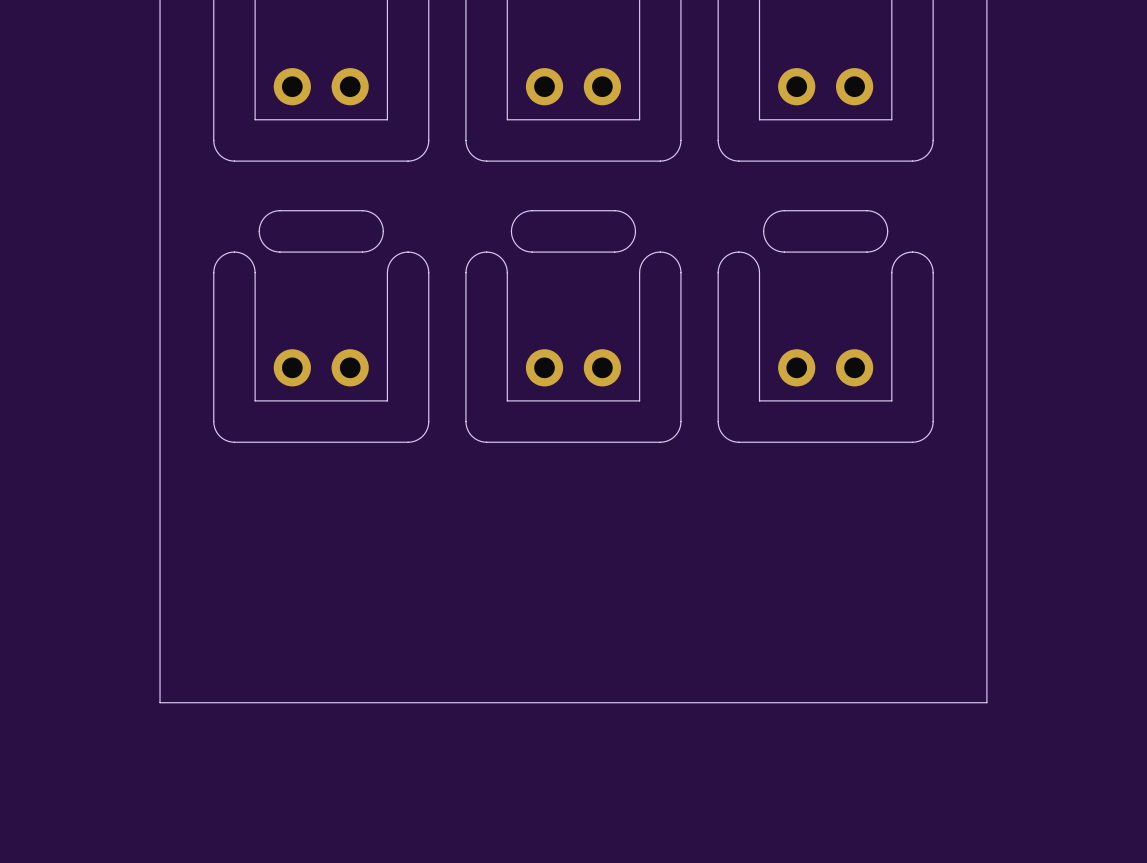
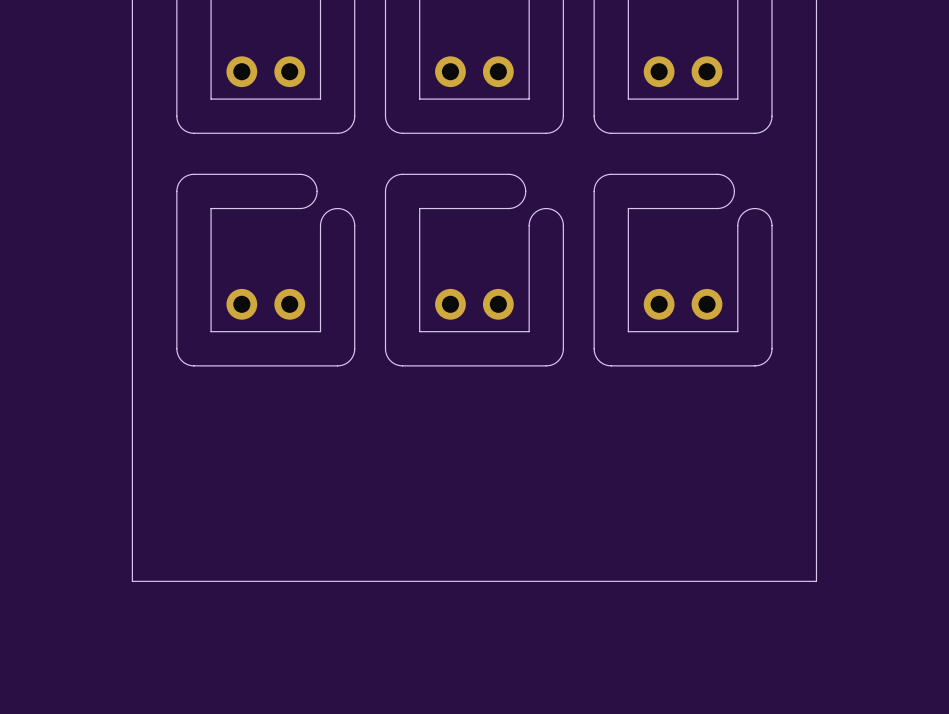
board edge: (279, 210) (272, 212) (265, 216) (260, 223) (259, 231) (260, 239) (265, 246) (272, 250) (279, 252) -> (211, 225) (211, 208) (231, 208)
board edge: (532, 210) (524, 212) (517, 216) (513, 223) (511, 231) (513, 239) (517, 246) (524, 250) (532, 252) -> (419, 225) (419, 208) (440, 208)
board edge: (784, 210) (776, 212) (769, 216) (765, 223) (763, 231) (765, 239) (769, 246) (776, 250) (784, 252) -> (628, 225) (628, 208) (648, 208)
board edge: (255, 272) (253, 264) (249, 258) (242, 253) (234, 252) (226, 253) (219, 258) (215, 264) (213, 272) -> (231, 174) (191, 174) (181, 179) (177, 189) (176, 225)
board edge: (507, 272) (505, 264) (501, 258) (494, 253) (486, 252) (478, 253) (472, 258) (467, 264) (465, 272) -> (440, 174) (400, 174) (390, 179) (385, 189) (385, 225)
board edge: (759, 272) (757, 264) (753, 258) (746, 253) (738, 252) (730, 253) (724, 258) (719, 264) (718, 272) -> (648, 174) (609, 174) (599, 179) (594, 189) (594, 225)

